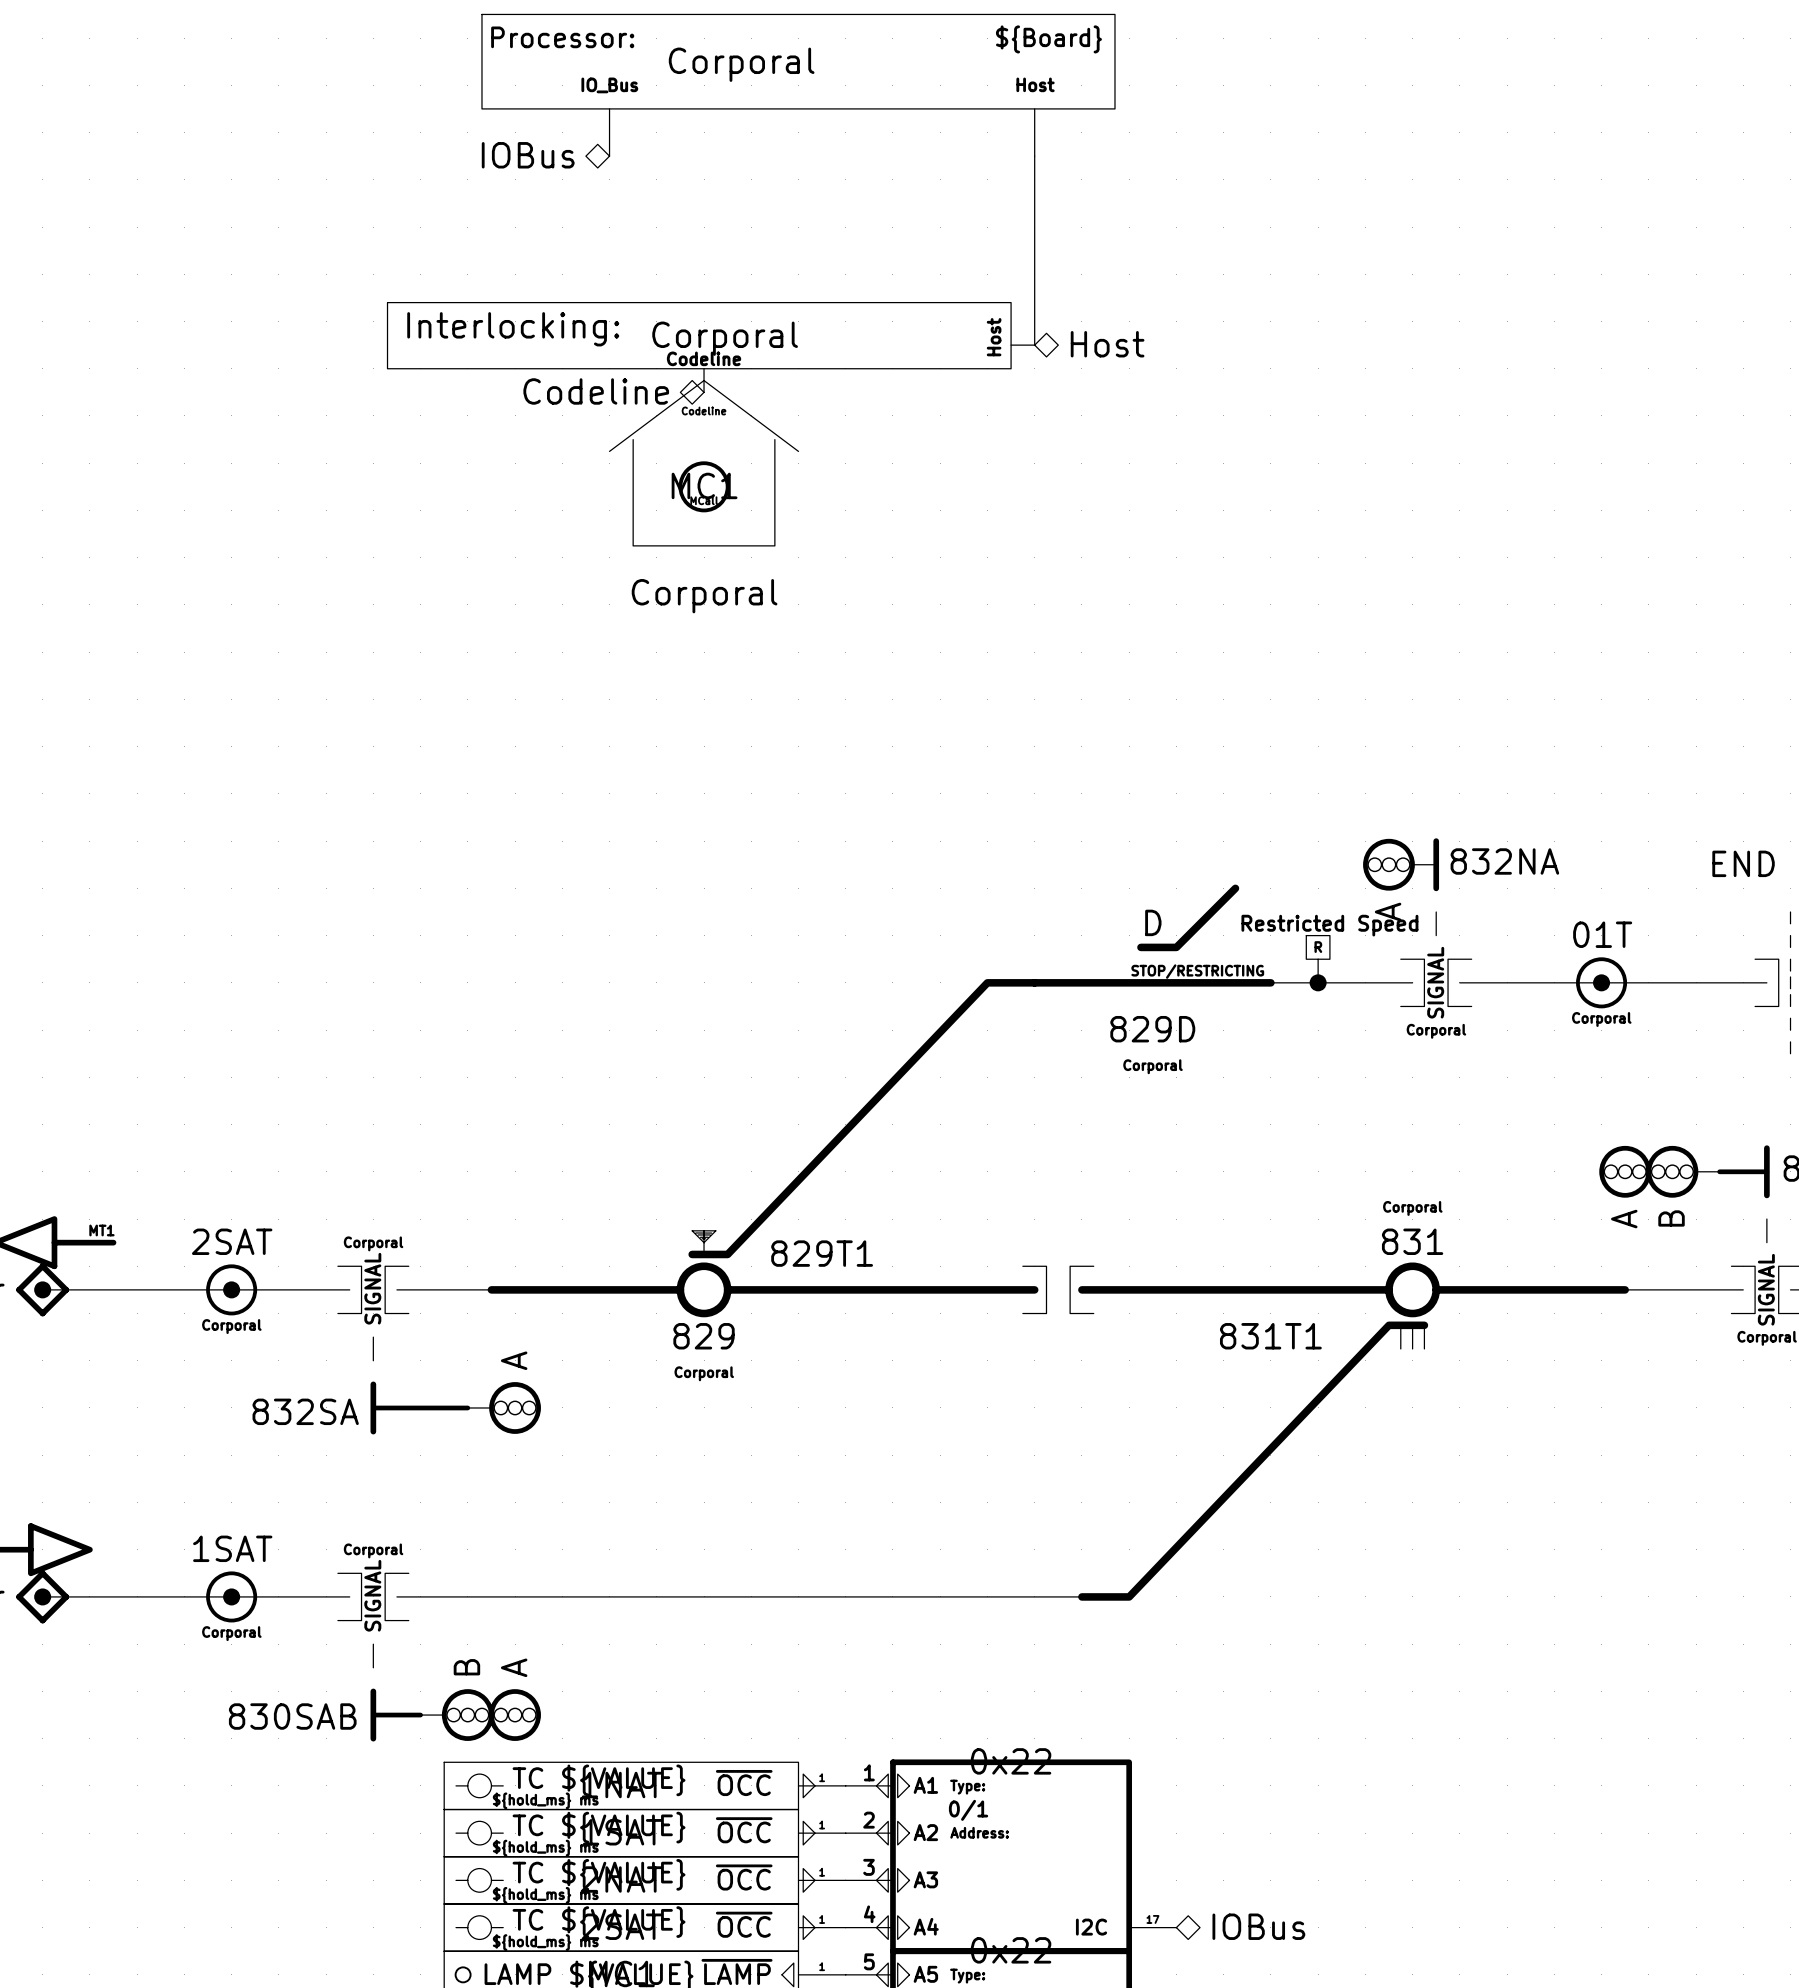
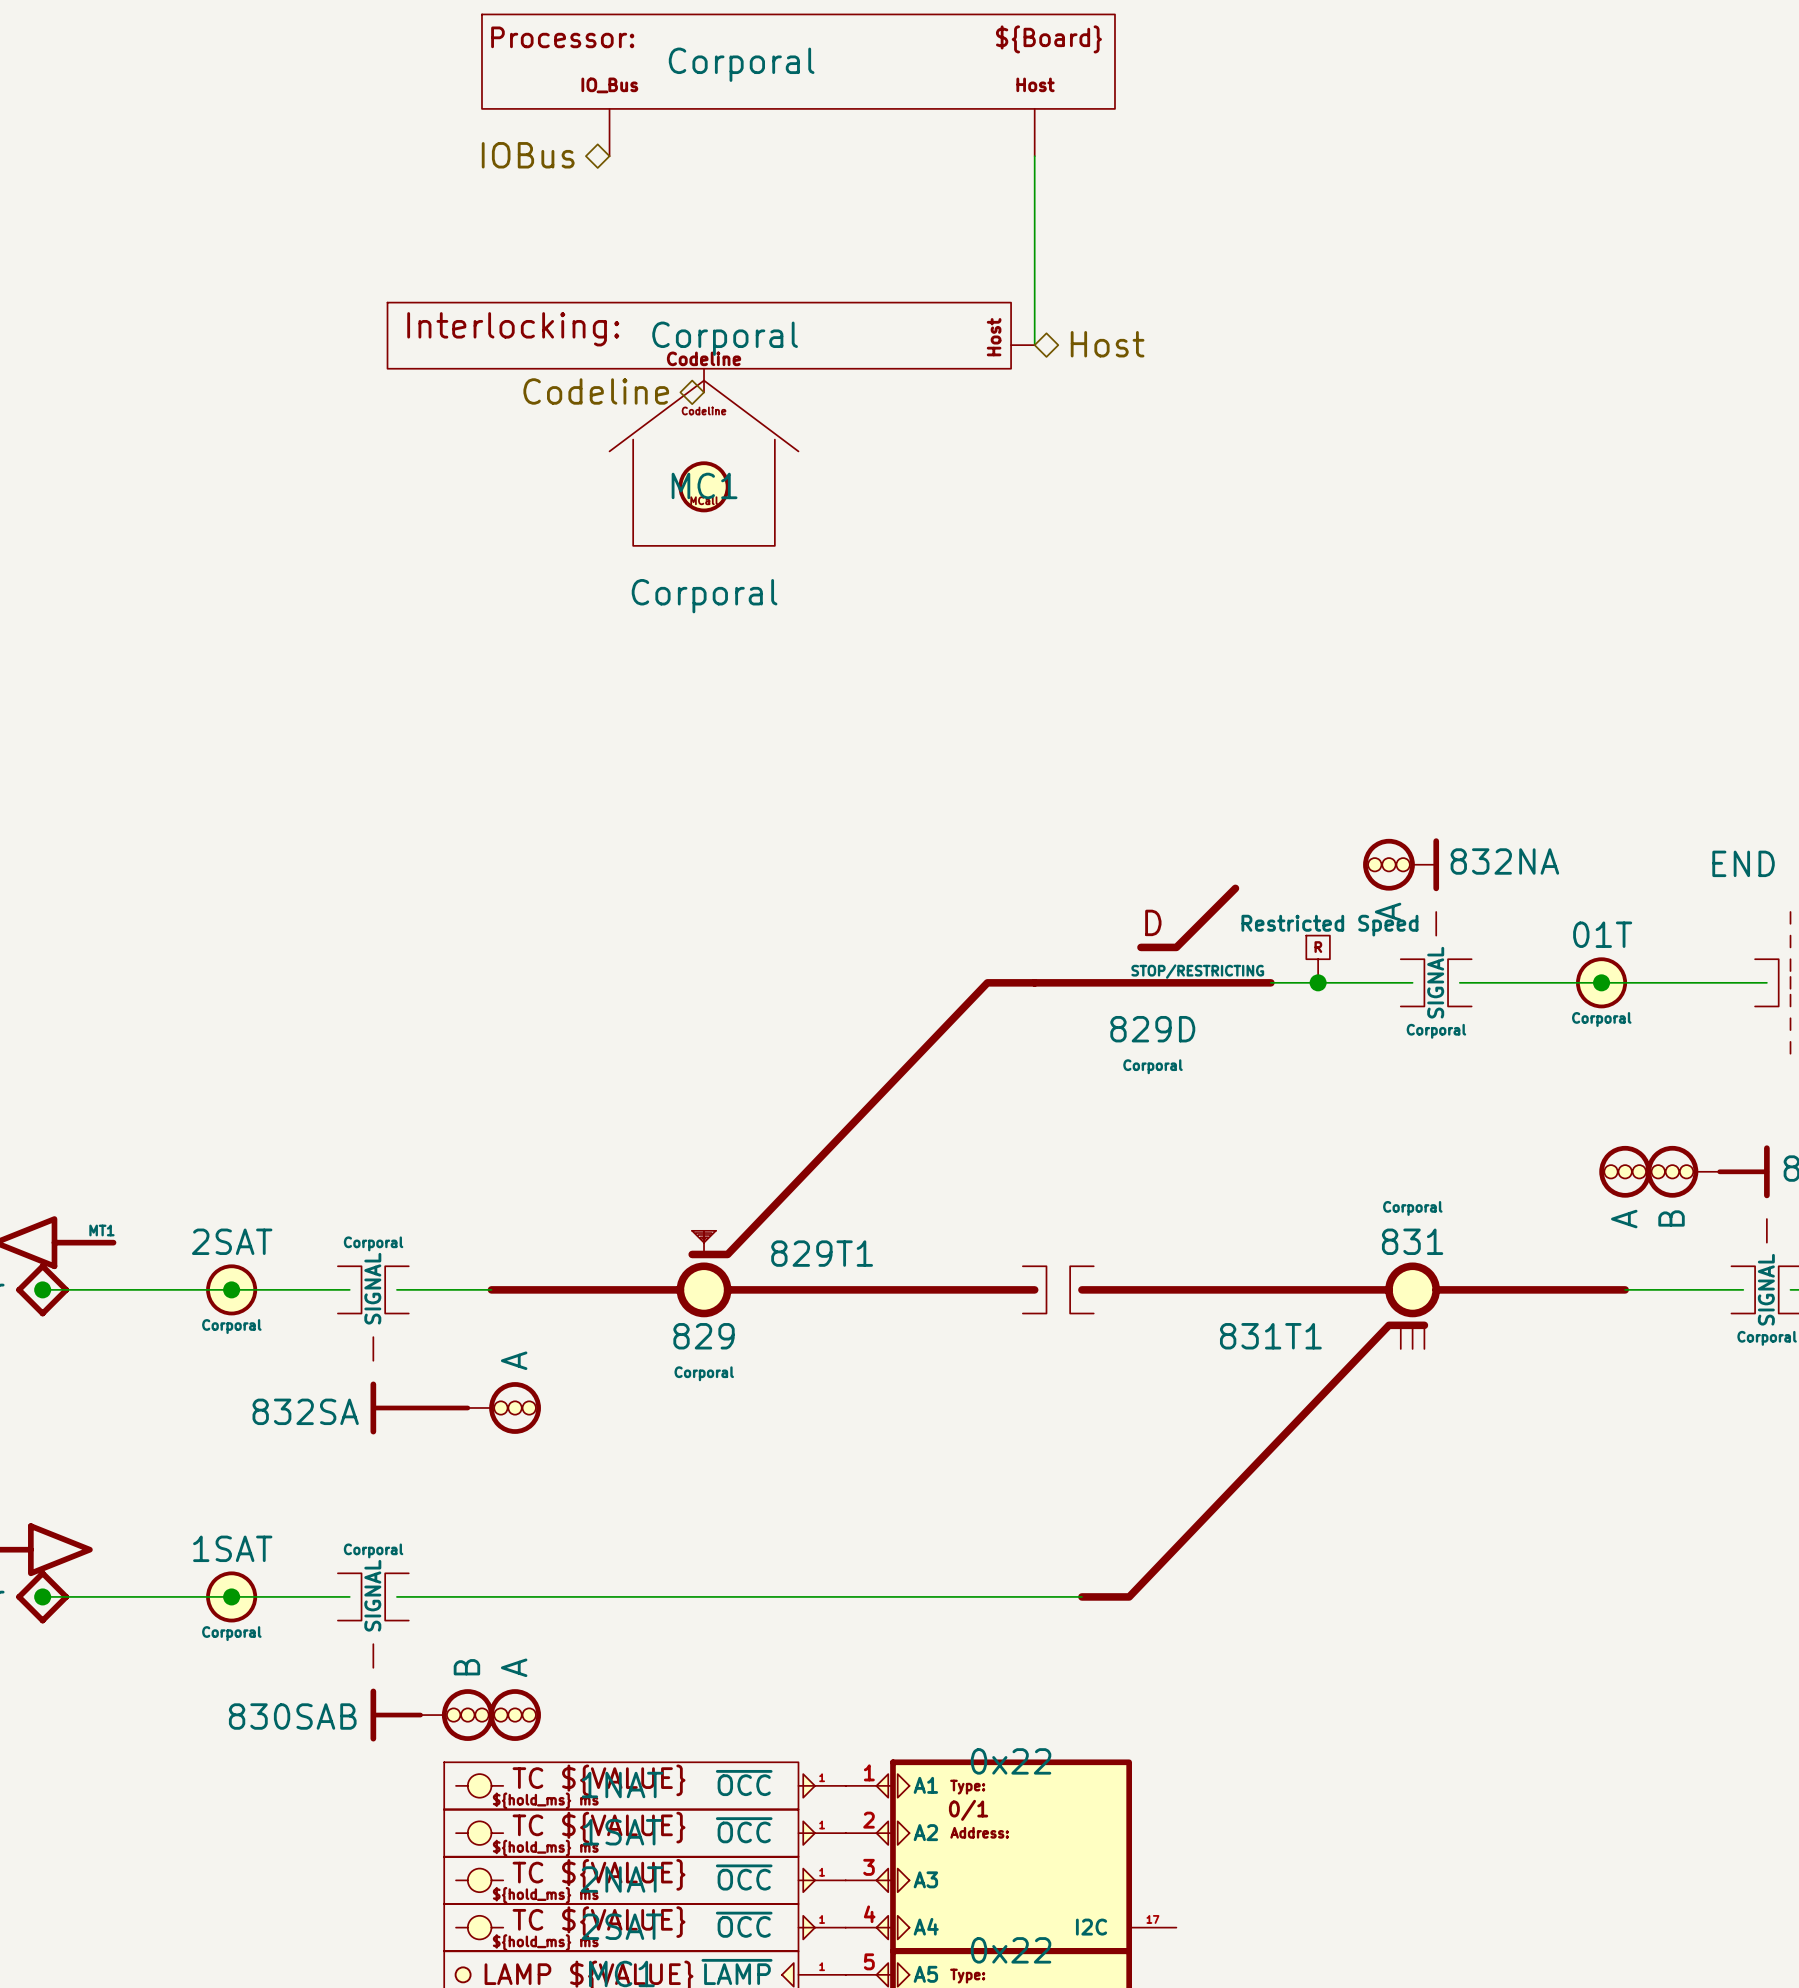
hierarchical label: IOBus (1258, 1926) -> none

